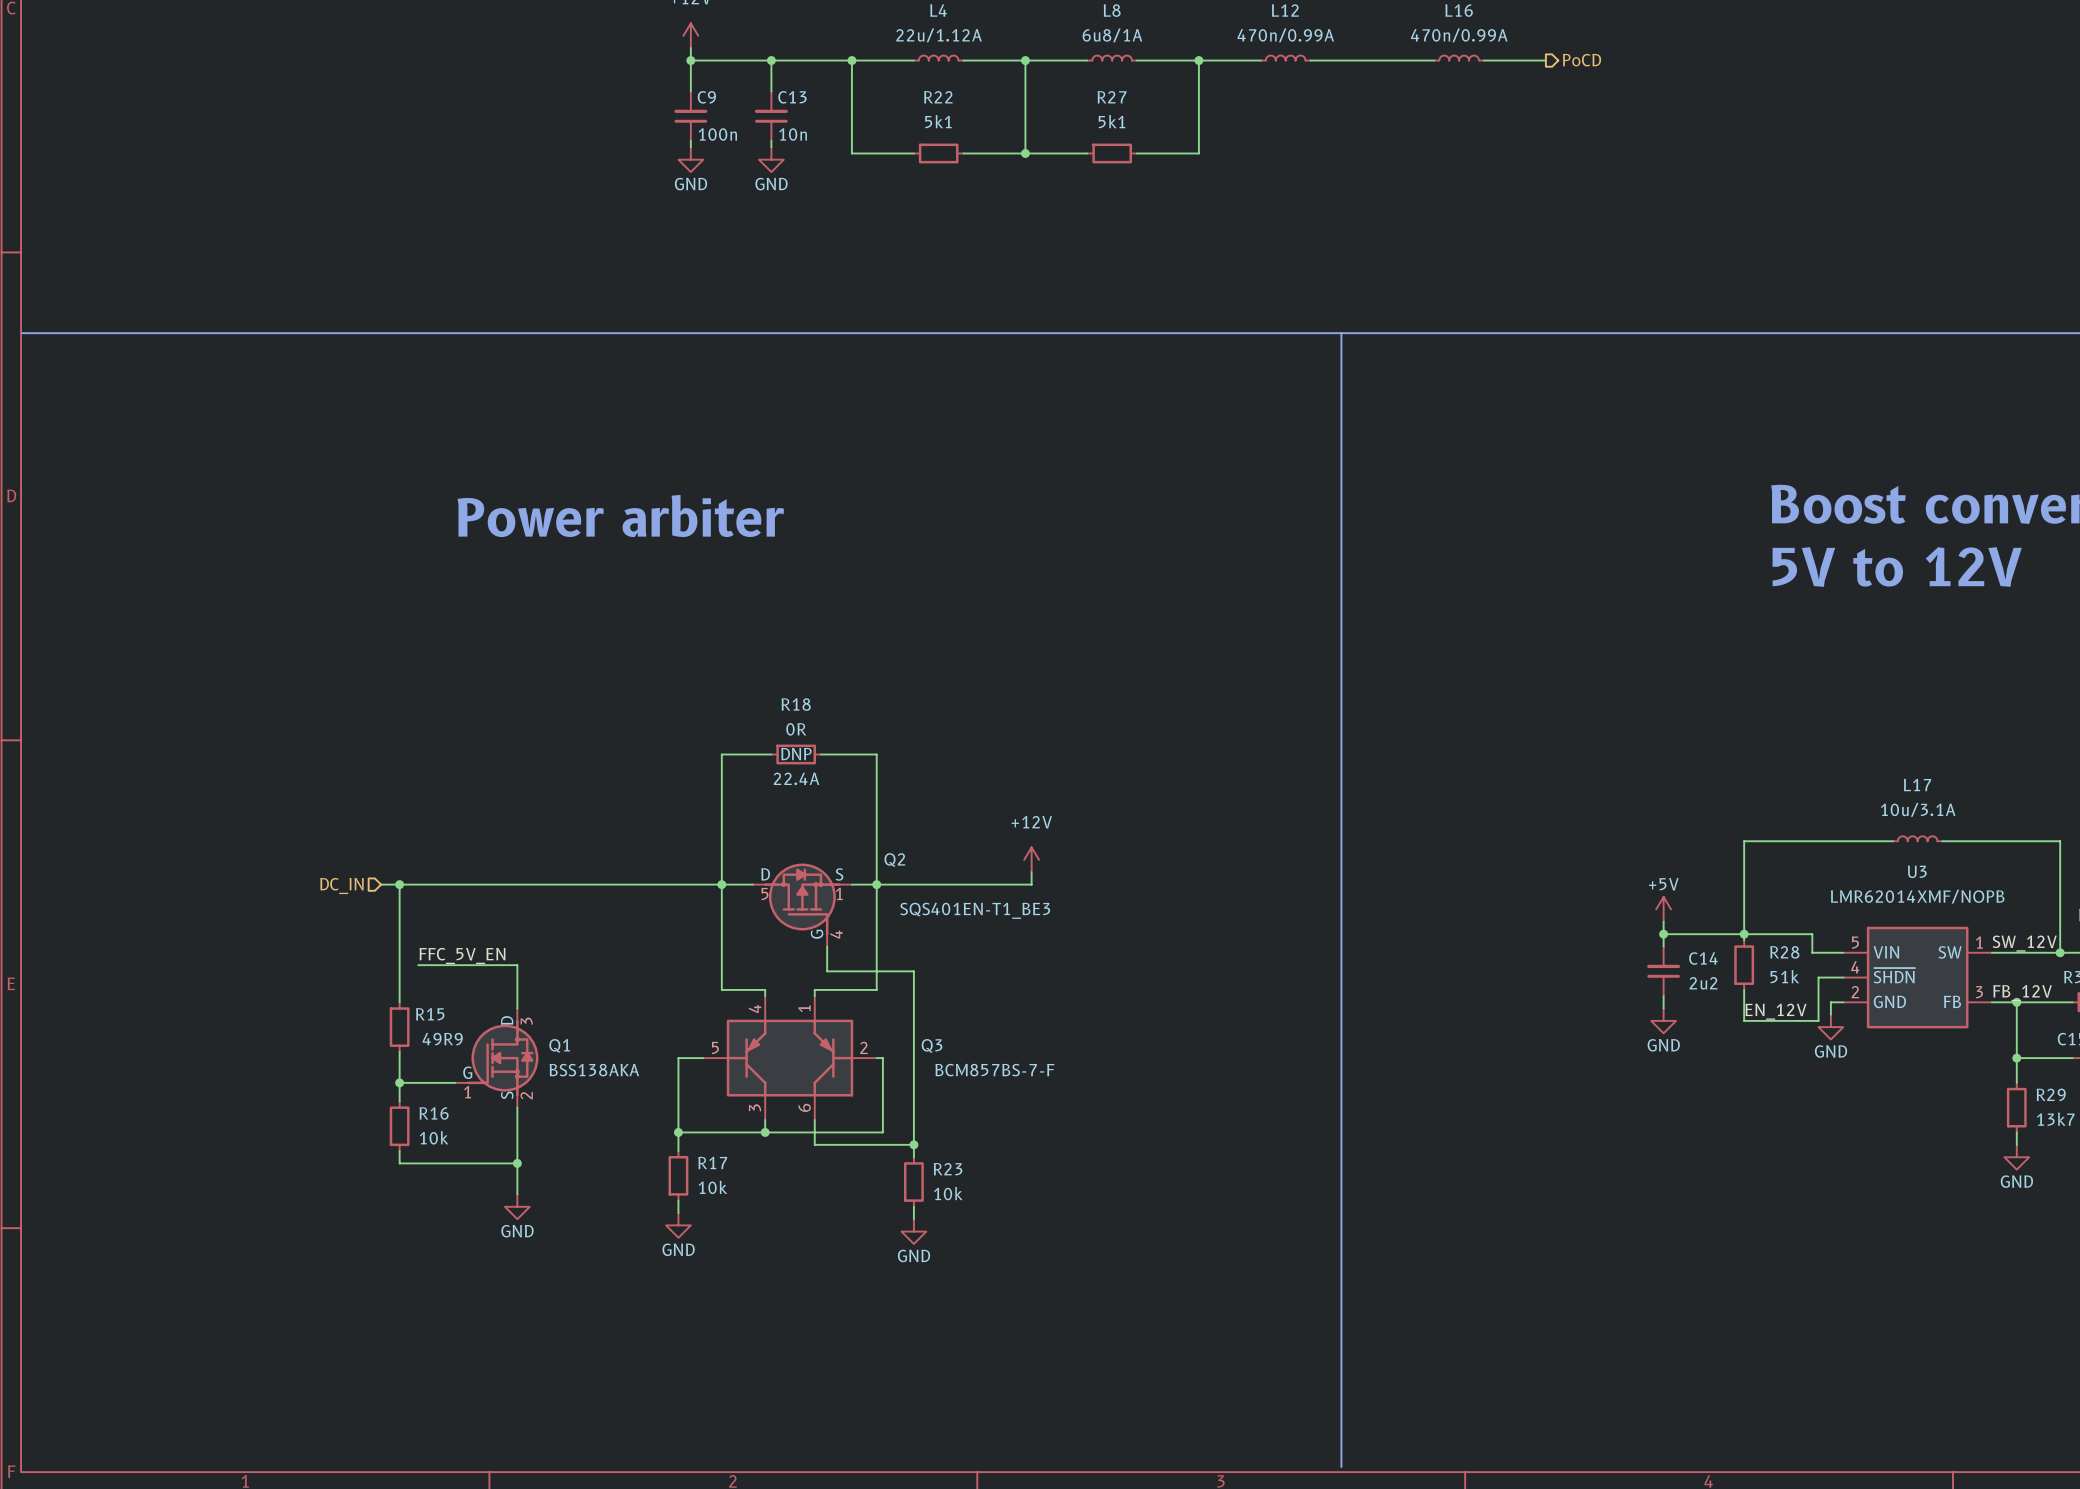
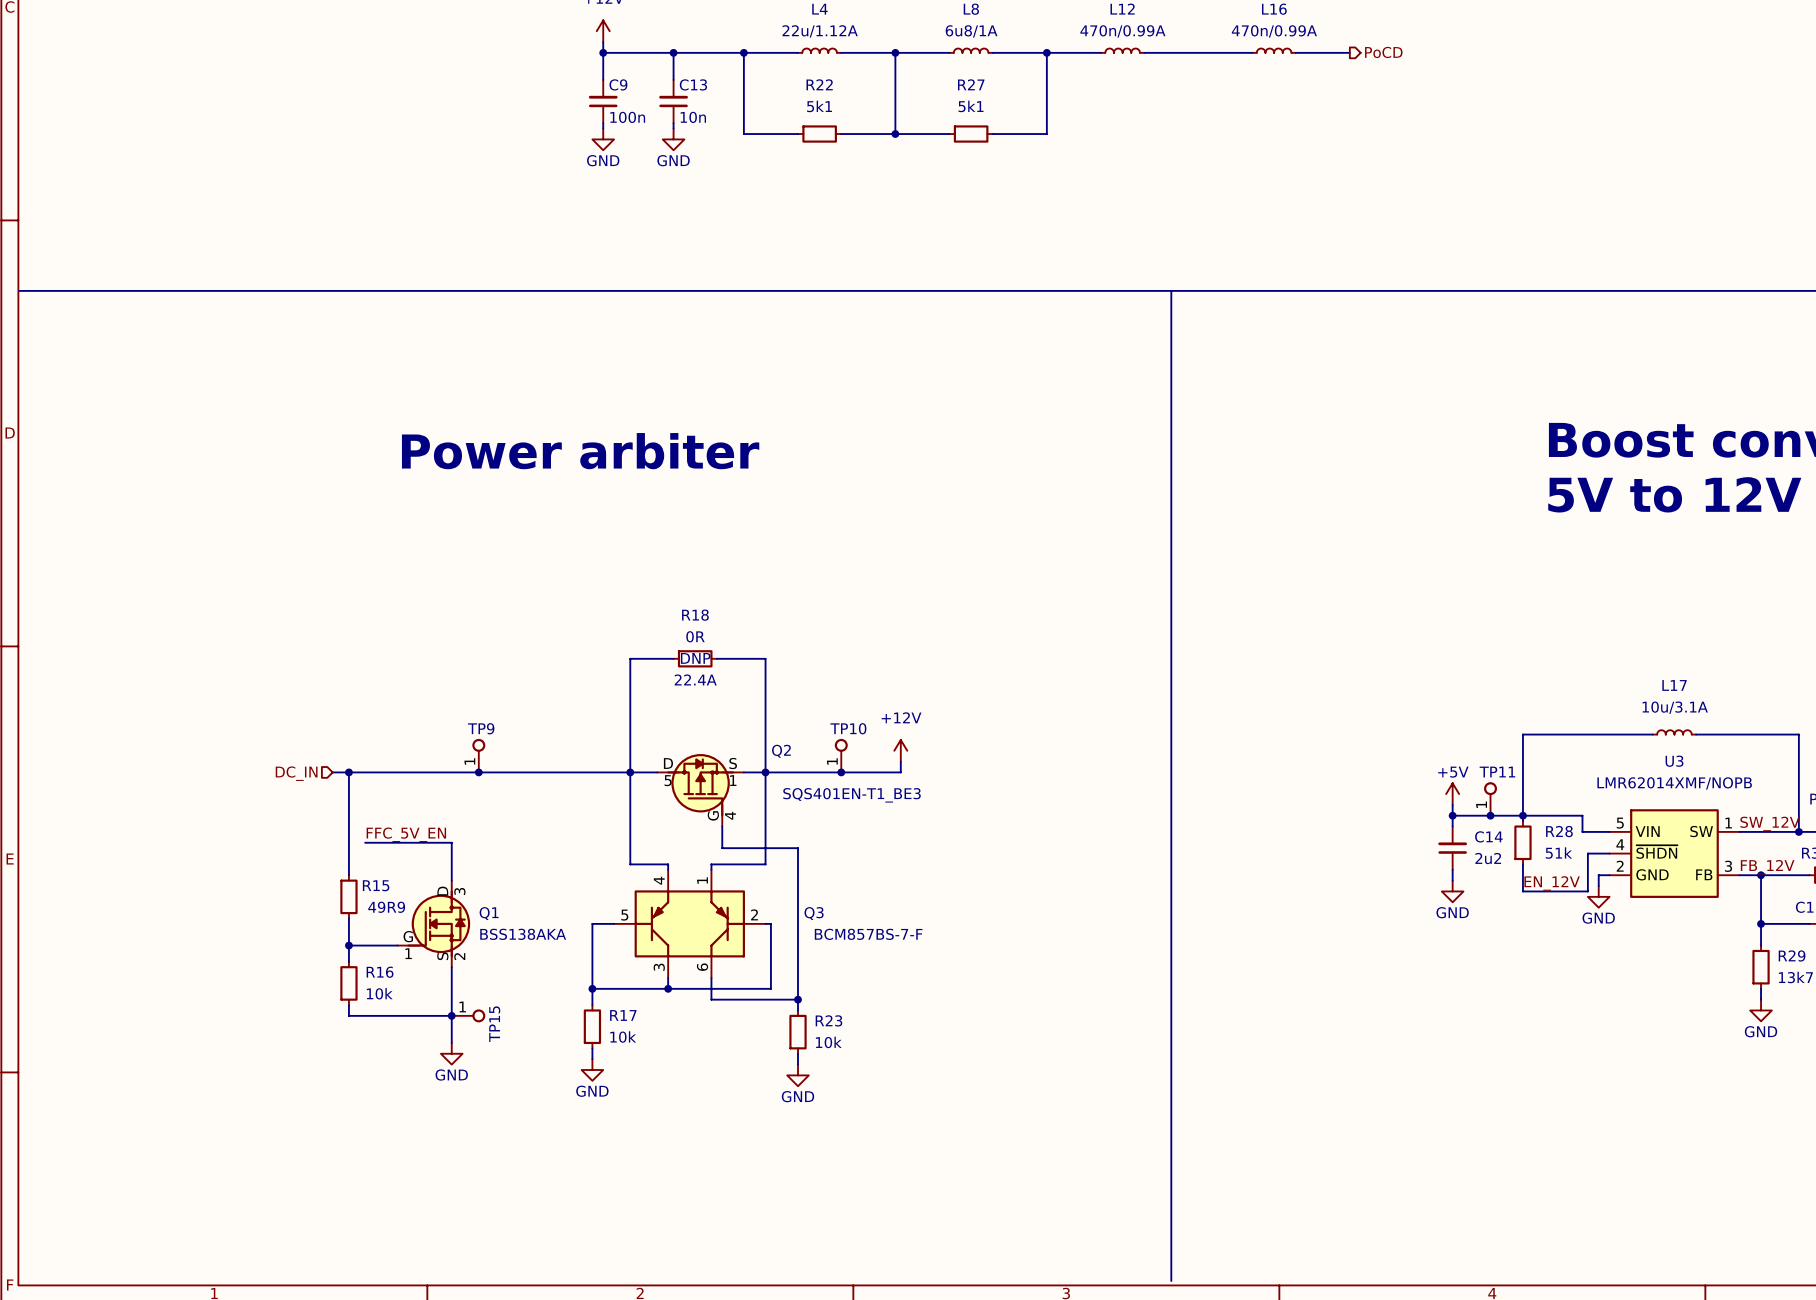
TP9: none -> (478, 755)
TP10: none -> (841, 755)
junction: none -> (478, 772)
junction: none -> (841, 772)
TP11: none -> (1490, 798)
junction: none -> (1490, 815)
TP15: none -> (468, 1015)

